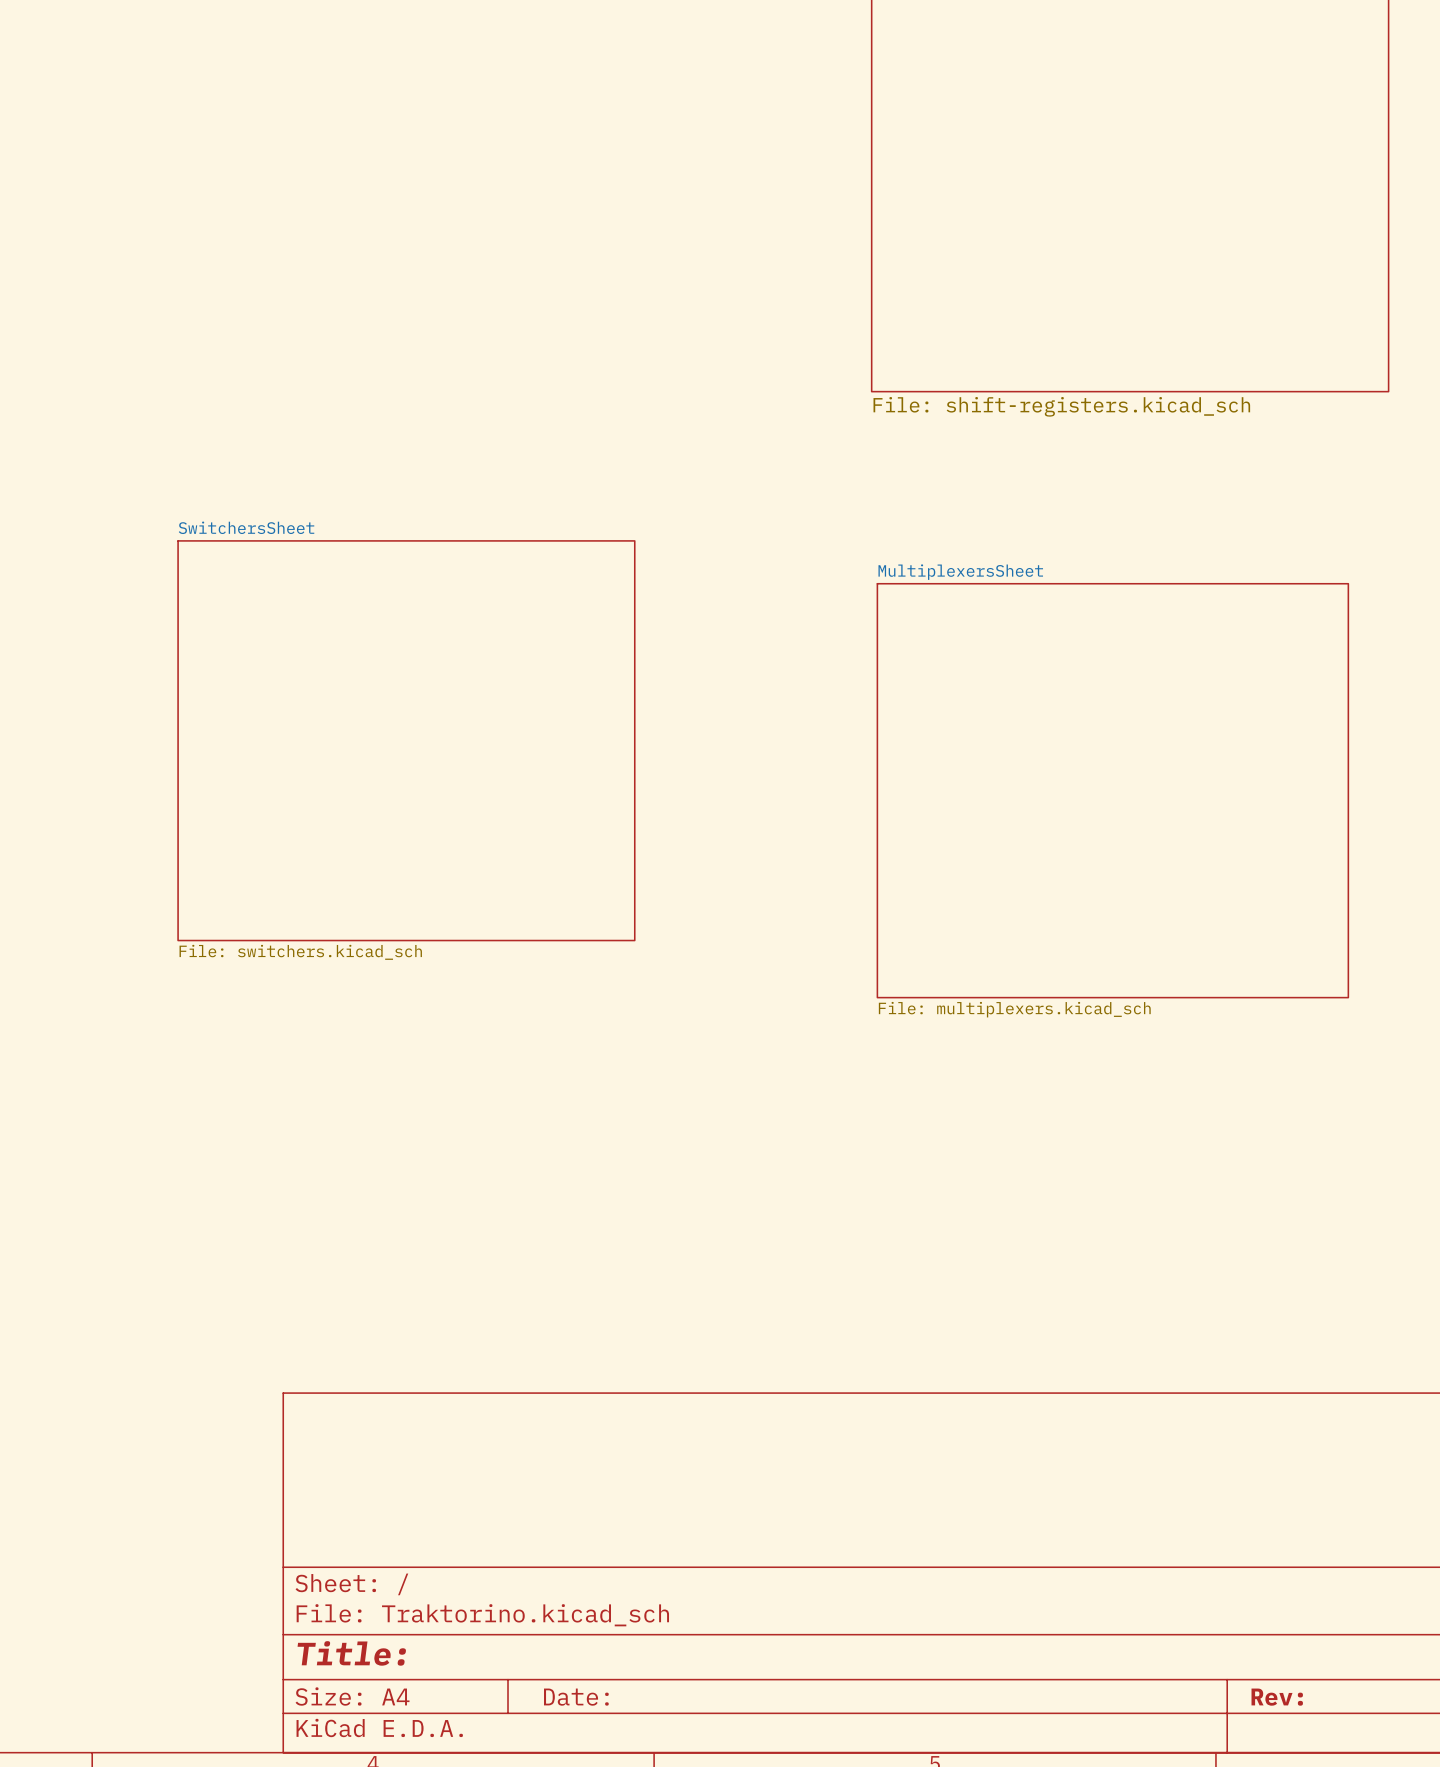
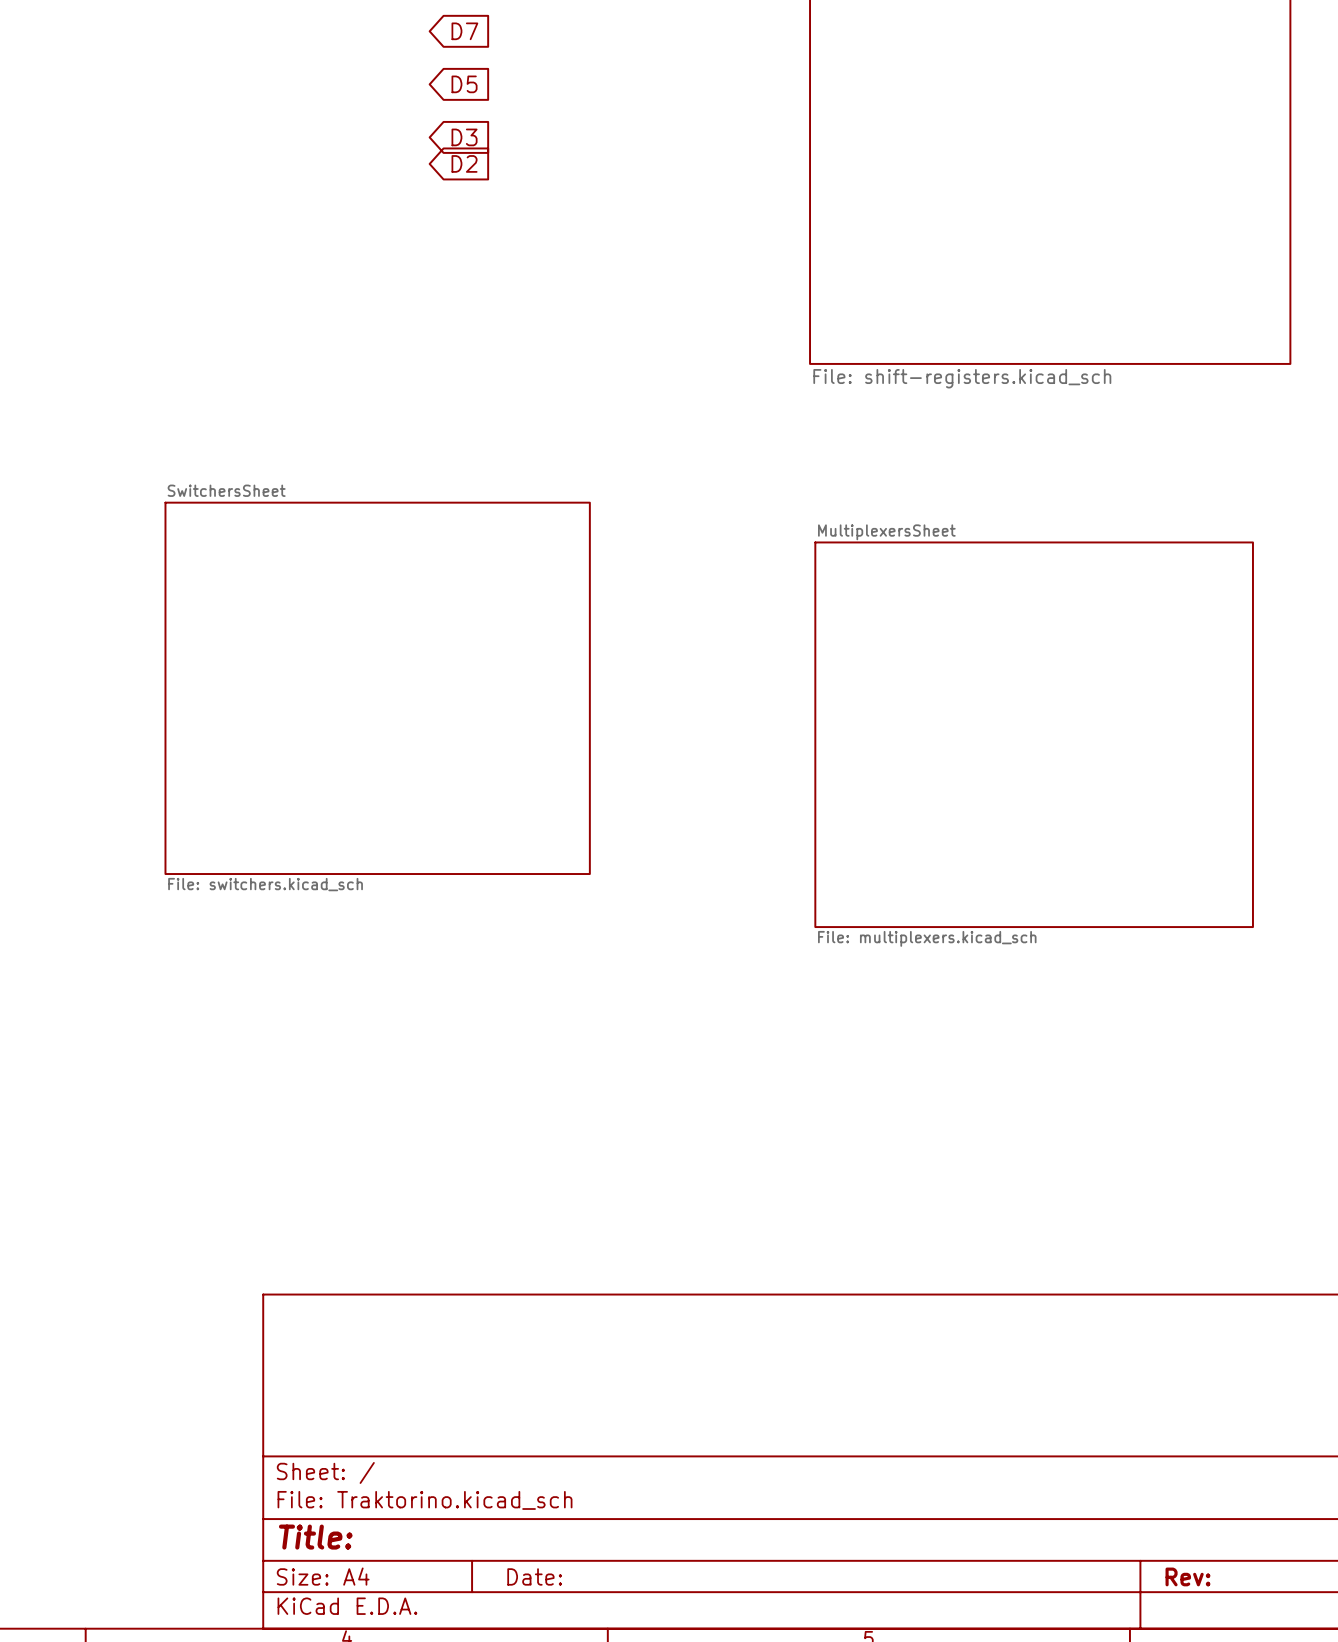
global label: none -> D7 (464, 31)
global label: none -> D5 (464, 84)
global label: none -> D3 (464, 137)
global label: none -> D2 (464, 163)

